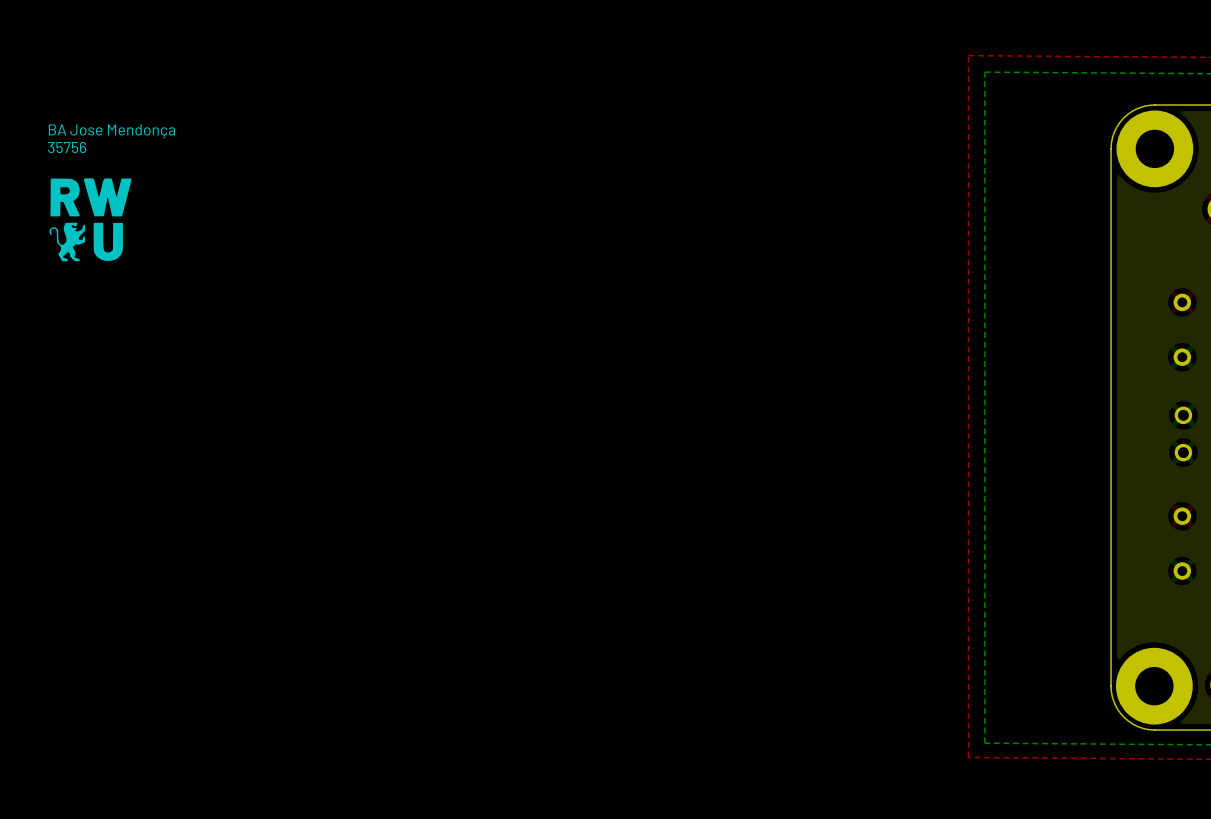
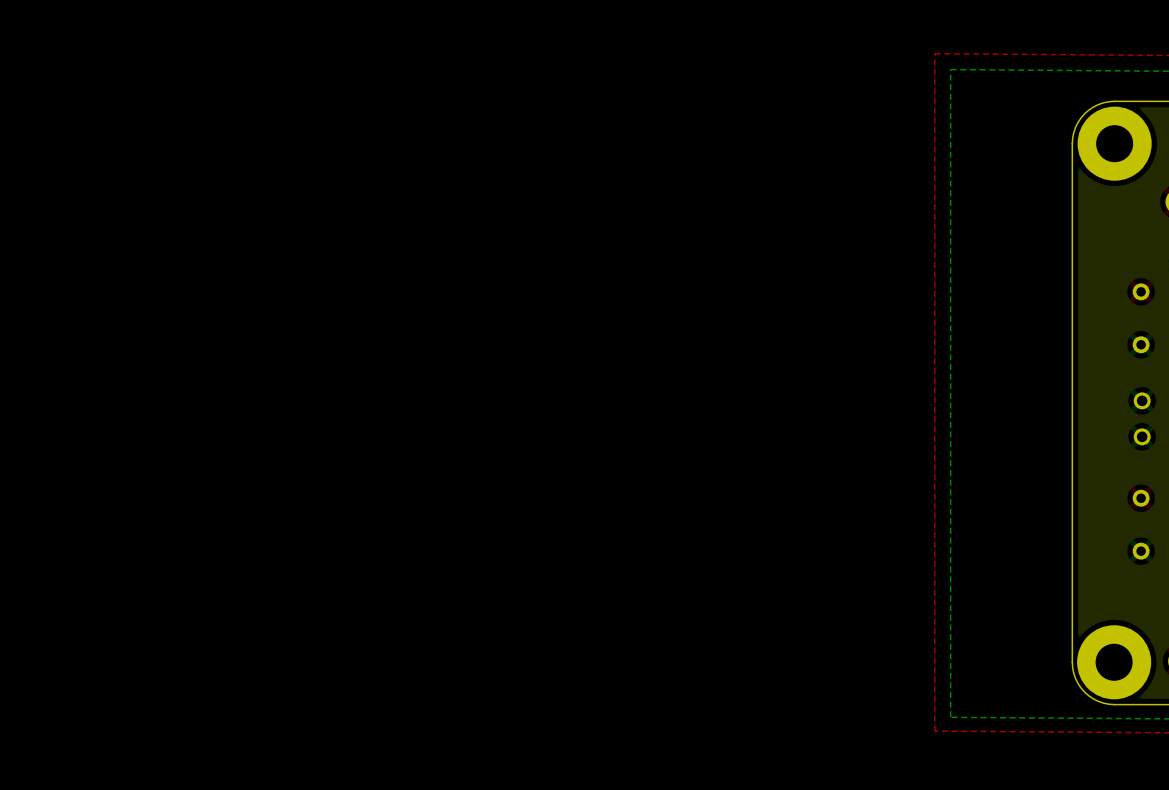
text: BA Jose Mendonça (111, 131) -> none
text: 35756 (67, 147) -> none
drawing: [49, 178, 132, 262] -> none

